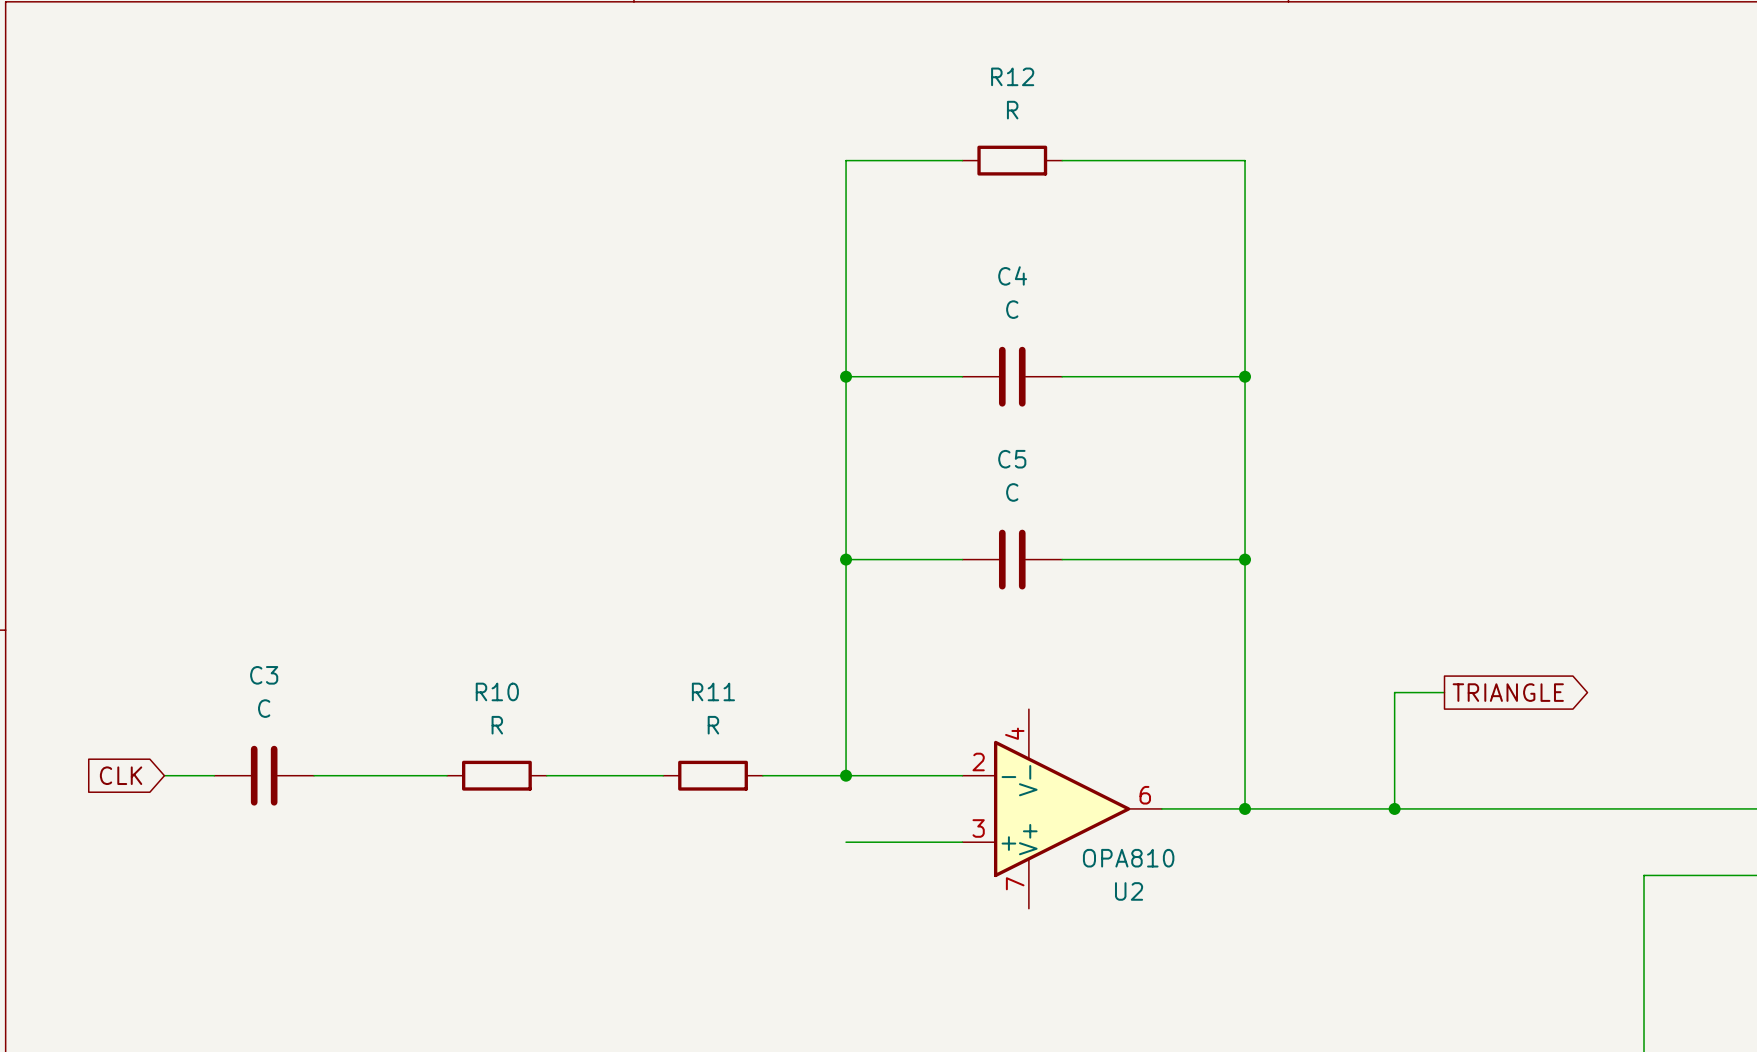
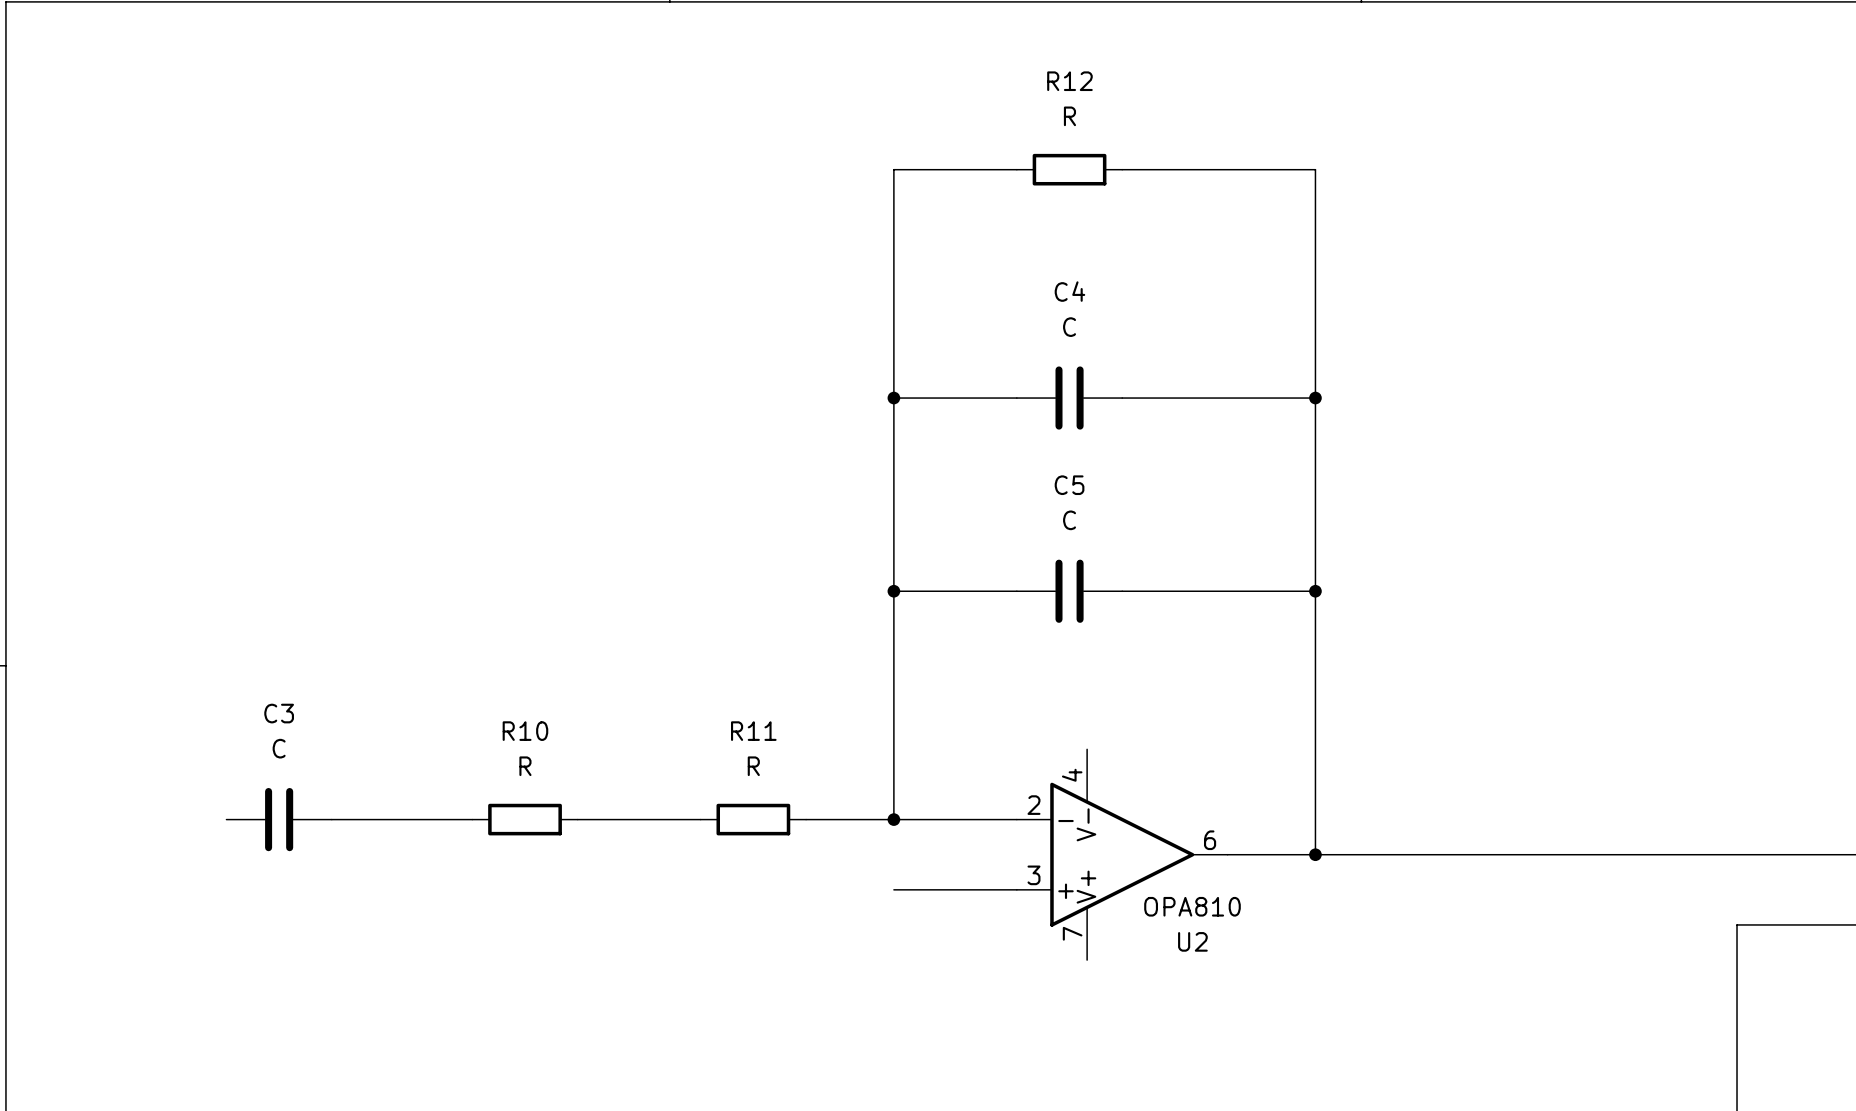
wire: (1444, 692) (1394, 692) (1394, 808) -> none
global label: TRIANGLE (1508, 692) -> none
global label: CLK (121, 775) -> none
wire: (164, 775) (214, 775) -> none
junction: (1394, 808) -> none

